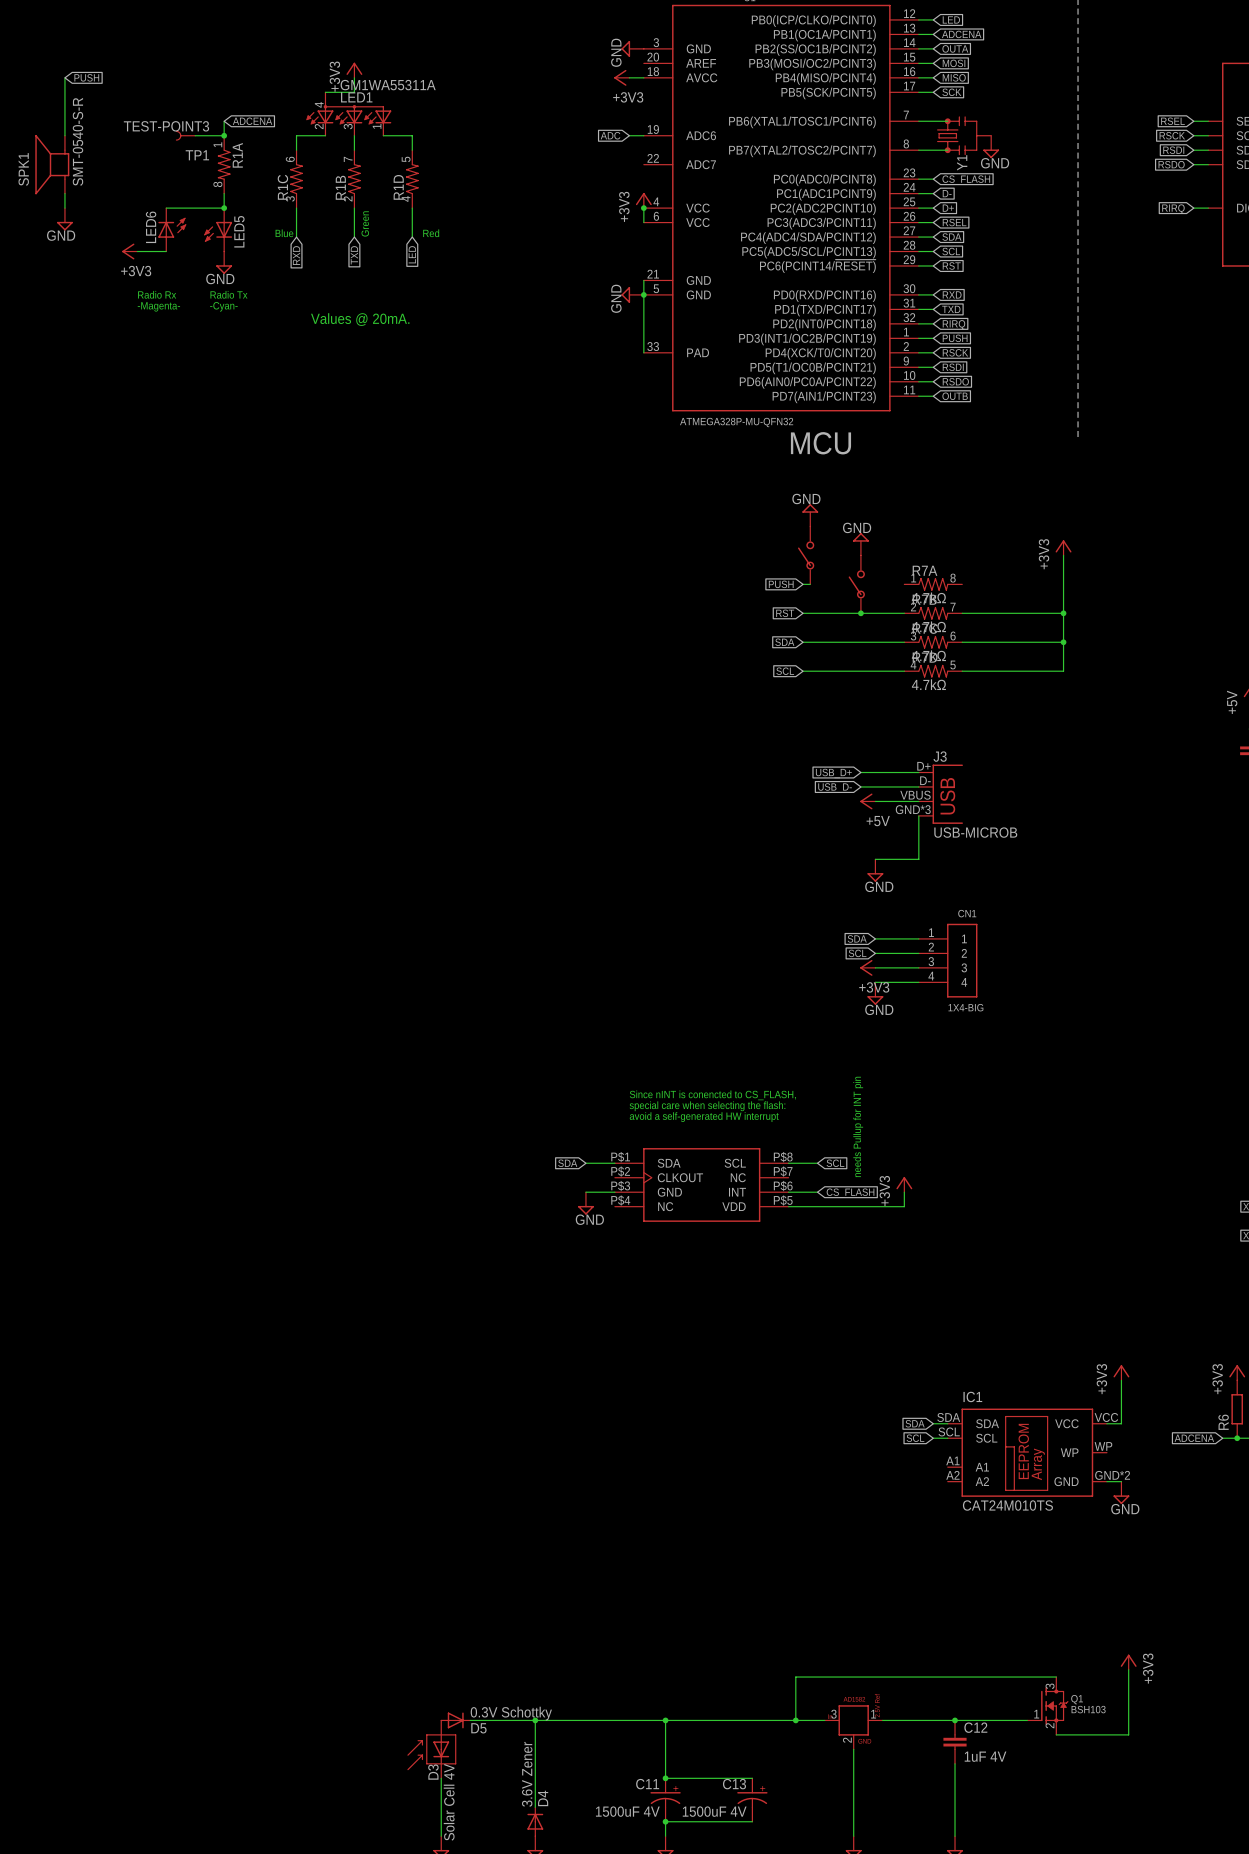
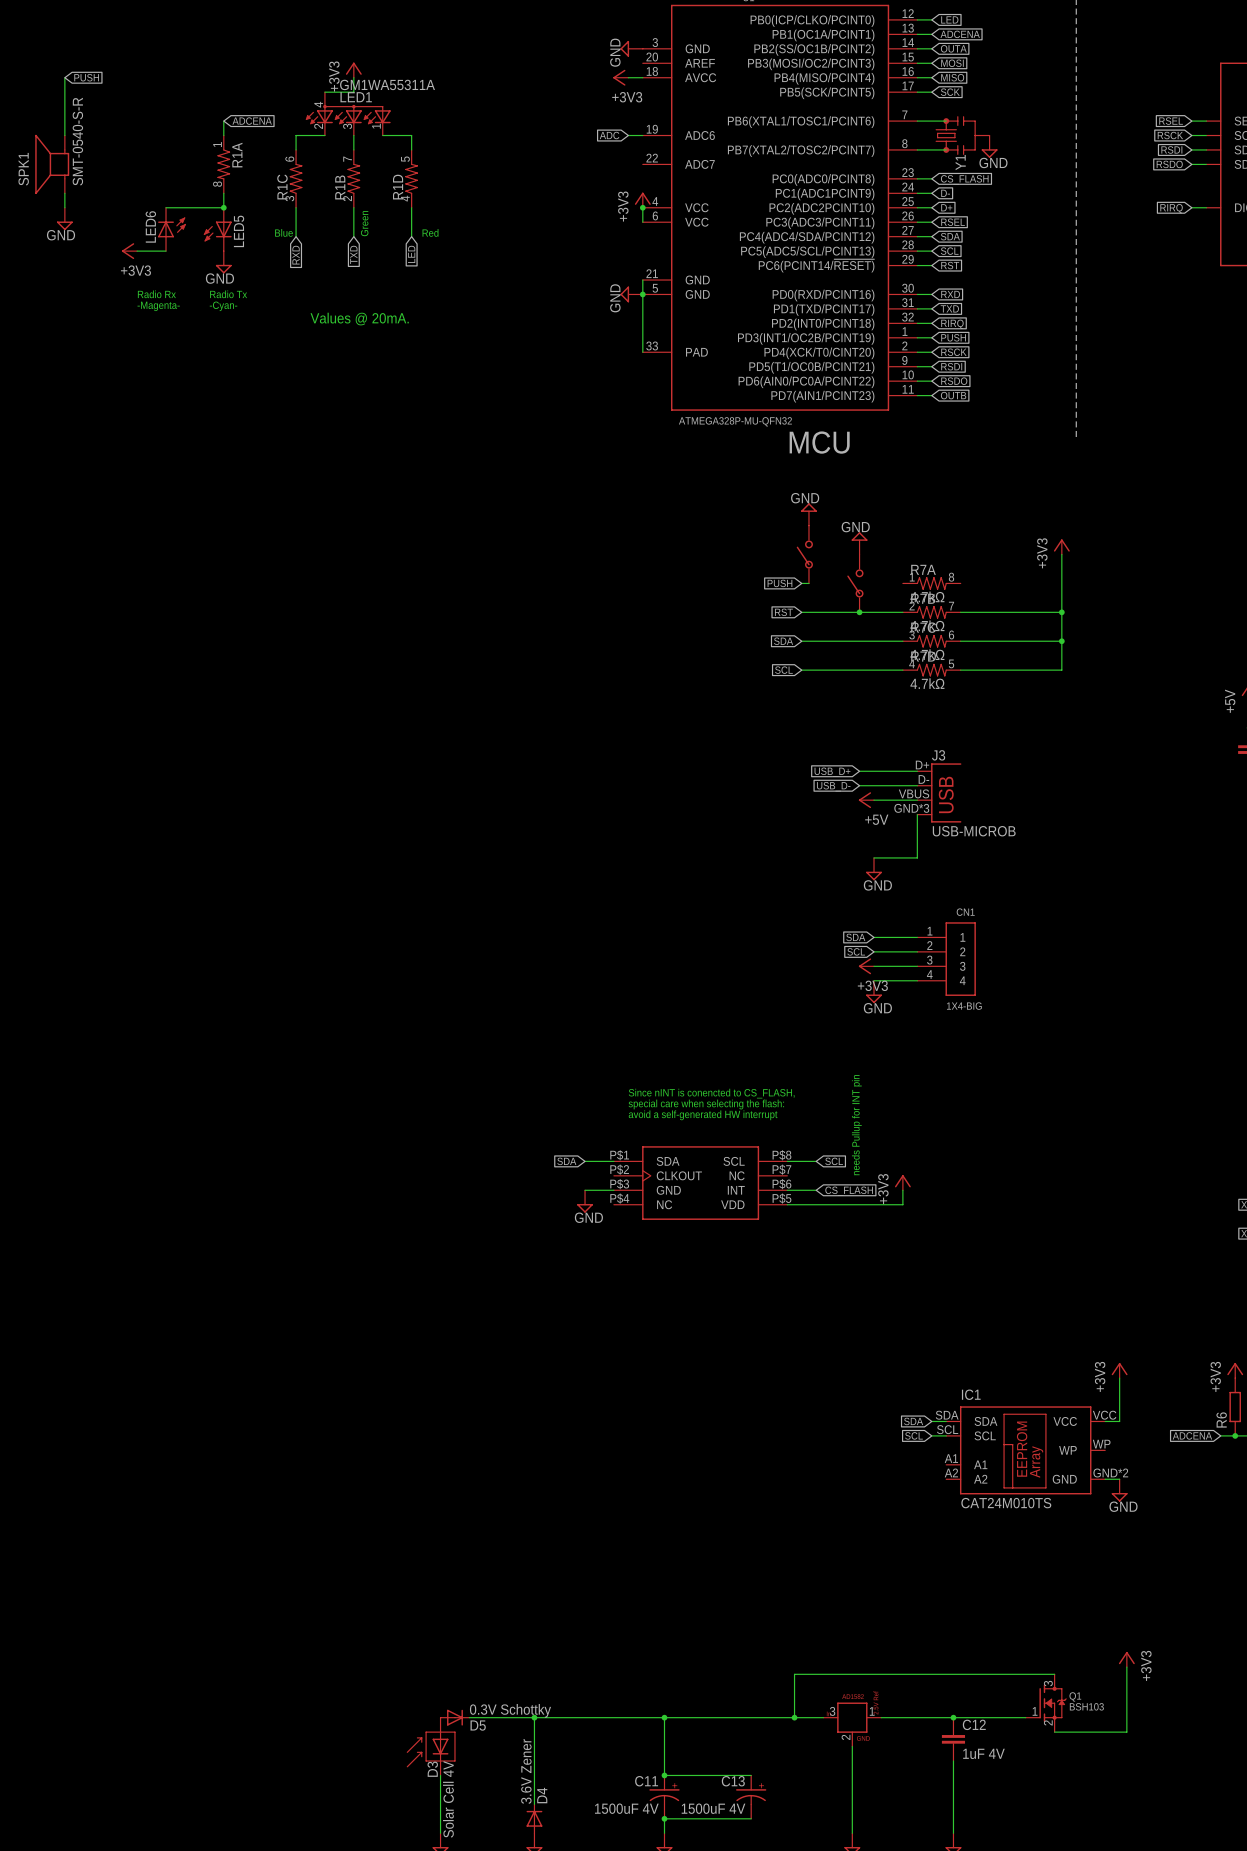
TP1: TEST-POINT3 (185, 135) -> none
wire: (195, 135) (224, 135) -> none
junction: (224, 135) -> none

